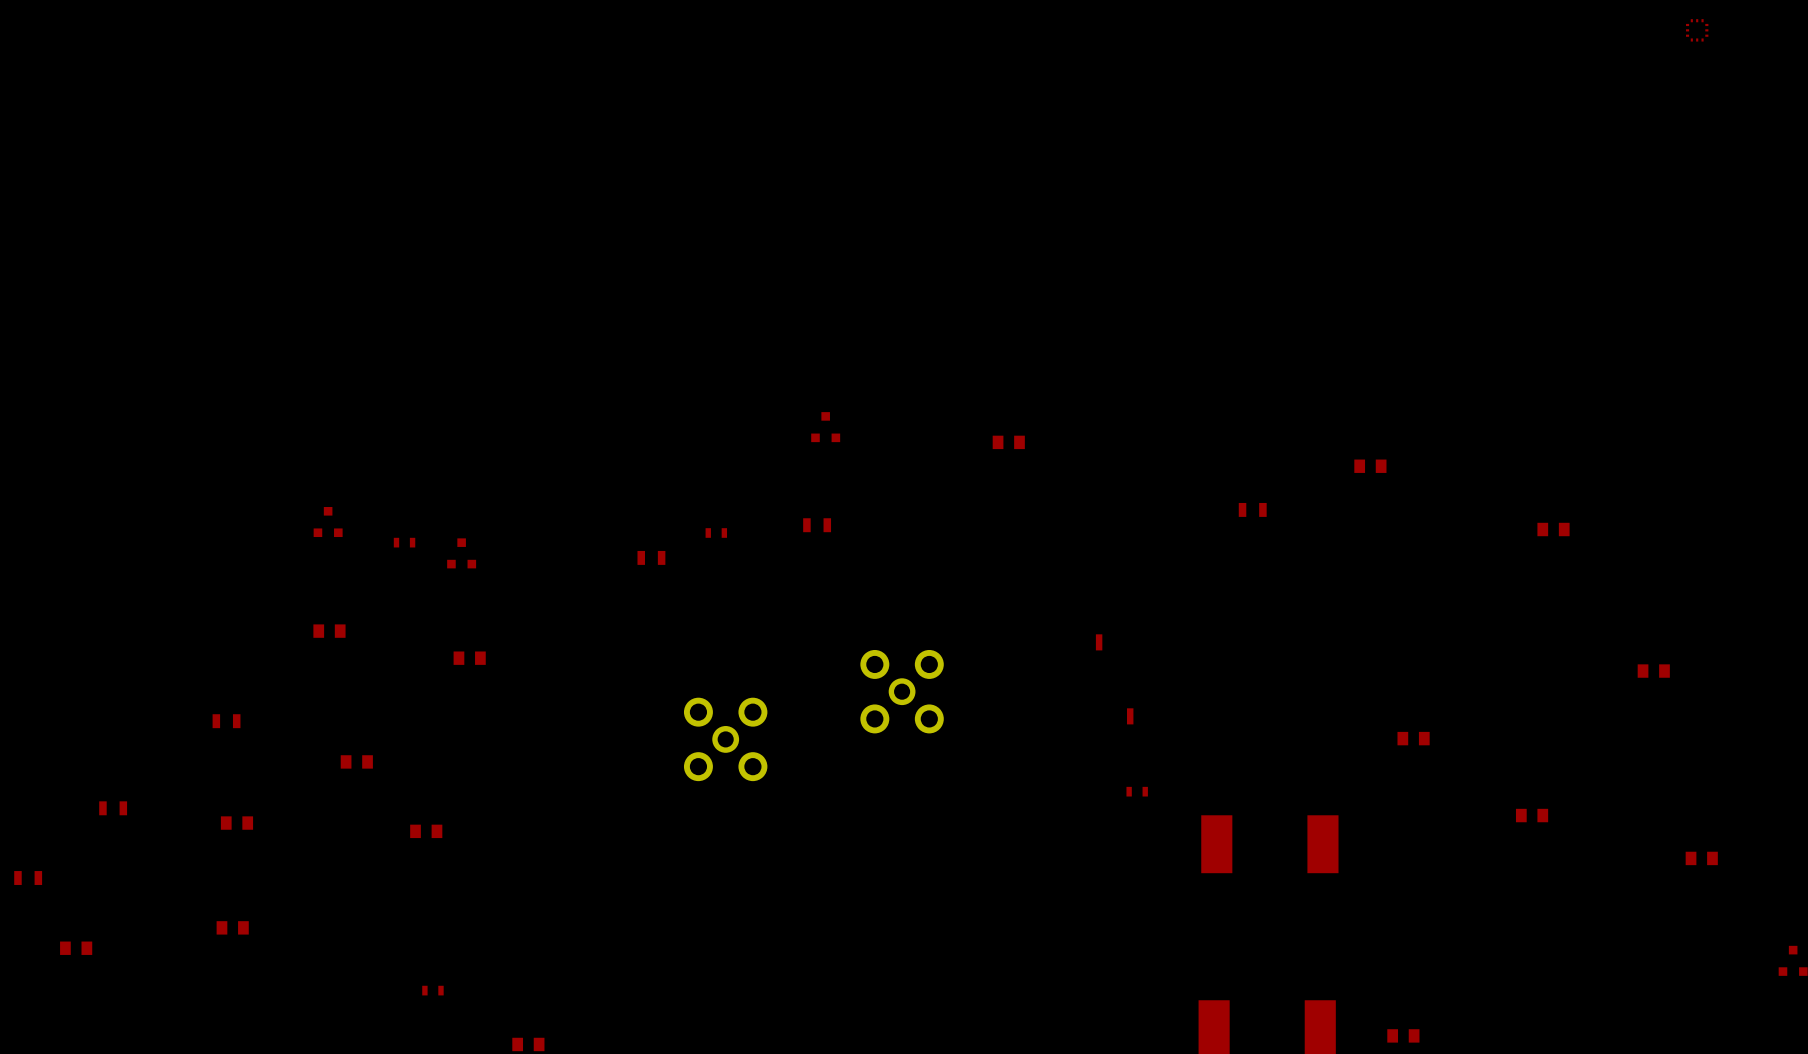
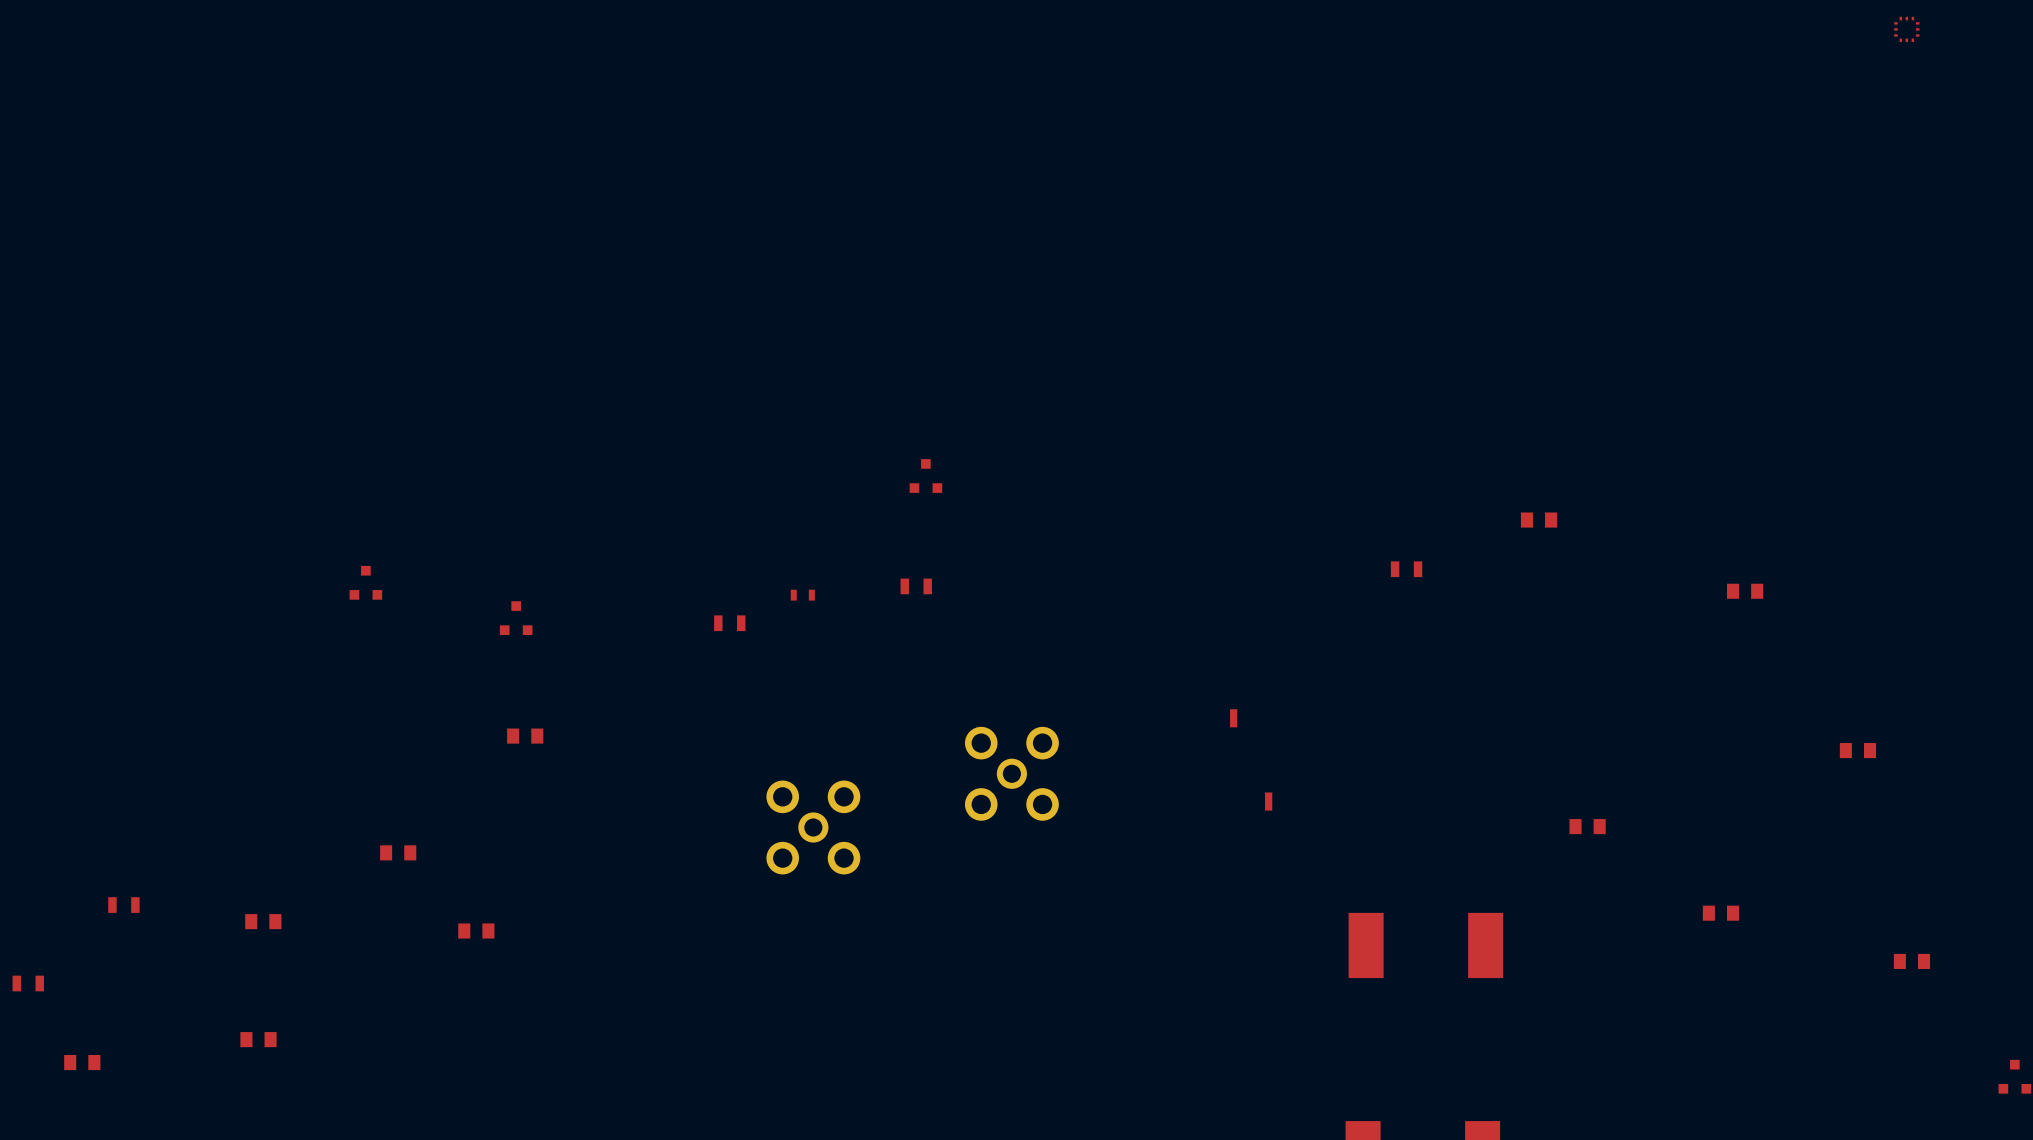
part: (1008, 442) -> none
part: (404, 542) -> none
part: (329, 631) -> none
part: (226, 721) -> none
part: (1137, 791) -> none
part: (432, 990) -> none

